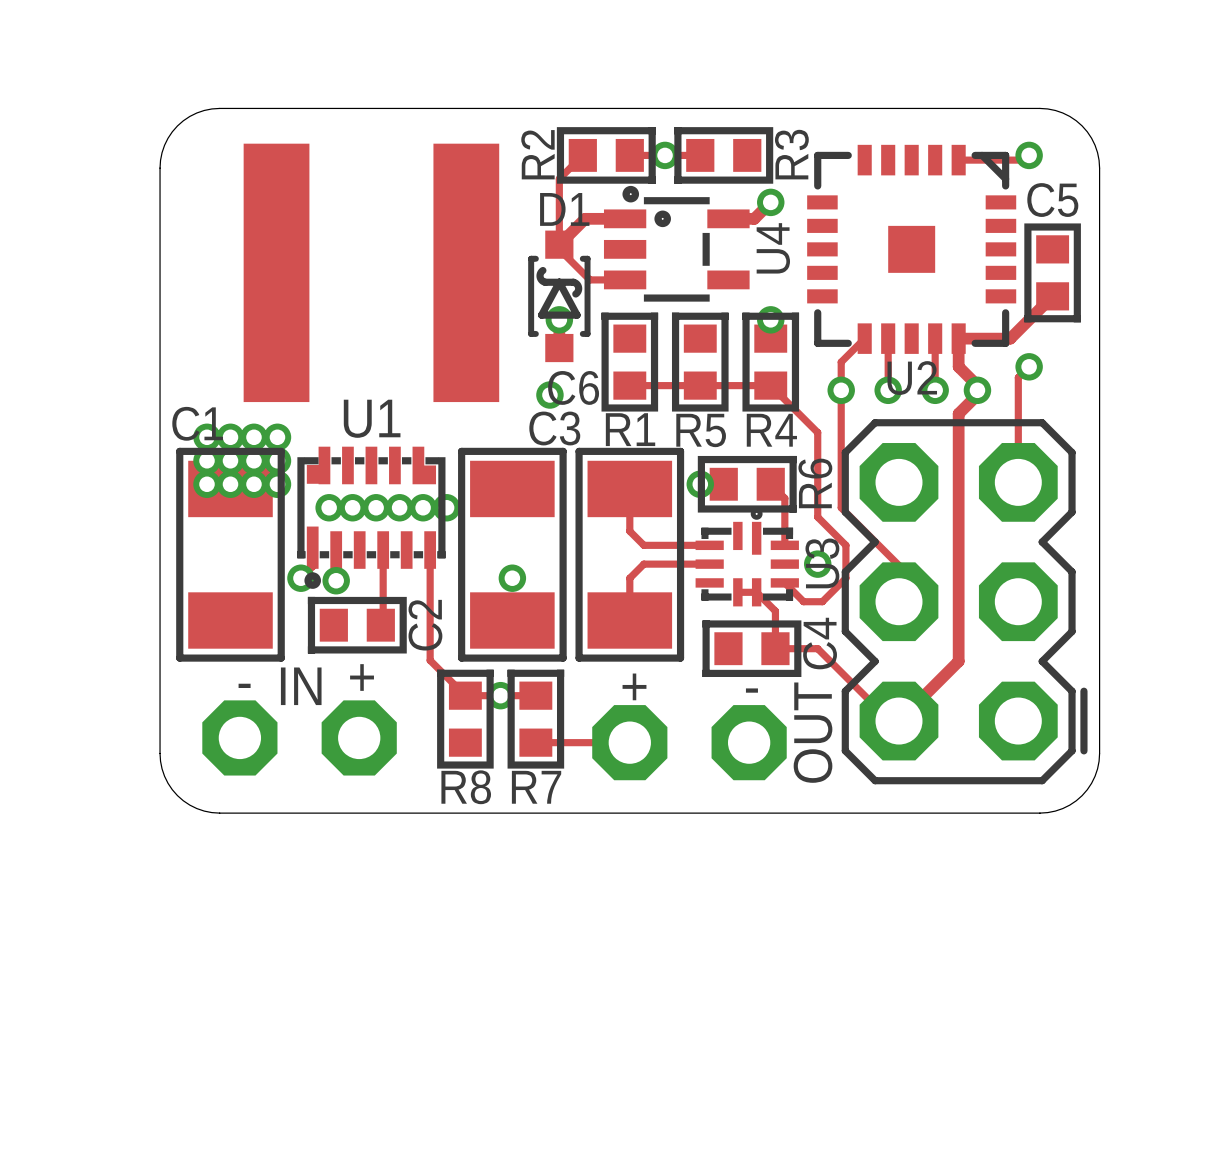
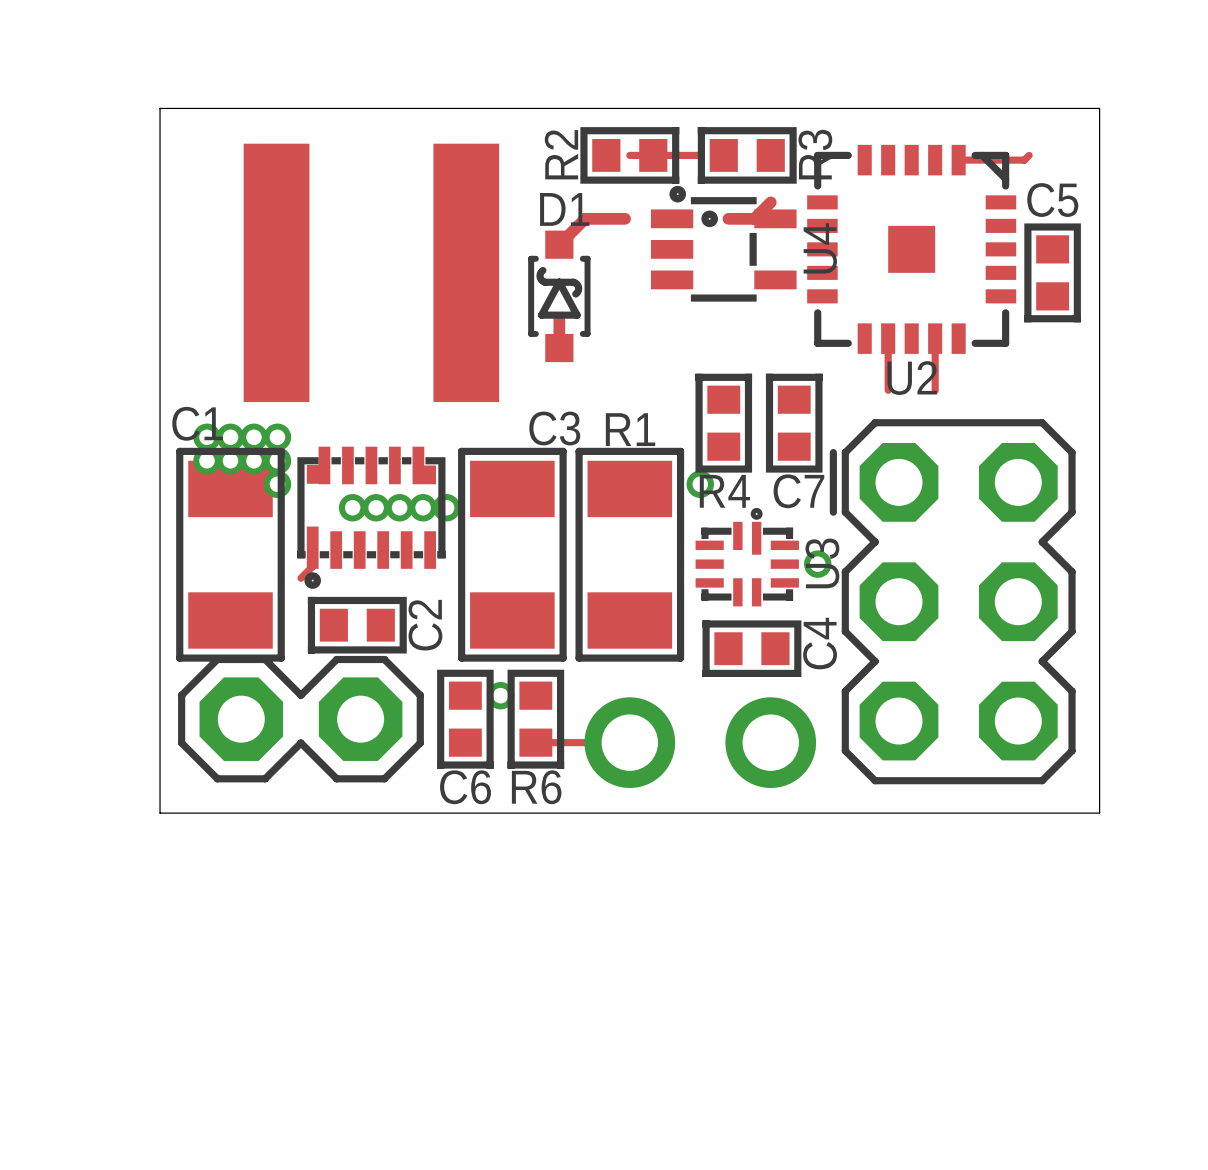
board edge: (219, 108) (196, 112) (177, 125) (164, 145) (160, 168) -> (219, 108) (160, 108) (160, 168)
board edge: (1039, 108) (1062, 112) (1082, 125) (1095, 145) (1099, 168) -> (1039, 108) (1099, 108) (1099, 168)
track: (582, 155) (559, 178) (559, 249) (589, 279) (625, 279) -> none
R2 position: (606, 155) -> (629, 155)
via: (665, 155) -> none
R3 position: (723, 155) -> (747, 155)
via: (1029, 155) -> none
via: (770, 202) -> none
U4 position: (676, 243) -> (723, 243)
track: (1052, 296) (1010, 338) (958, 338) (958, 366) (977, 385) (977, 395) (958, 413) (958, 661) (899, 721) (890, 721) (817, 648) (775, 648) (775, 611) (756, 592) (737, 592) -> none
via: (559, 319) -> none
via: (770, 319) -> none
track: (864, 338) (841, 362) (841, 507) (899, 565) (899, 601) -> none
C6 rotation: 0° (629, 362) -> 180° (465, 719)
C6 position: (629, 362) -> (465, 719)
R5: (700, 362) -> none
R4 position: (770, 362) -> (723, 423)
track: (1029, 366) (1018, 377) (1018, 482) -> none
via: (1029, 366) -> none
track: (629, 385) (770, 385) (817, 432) (817, 517) (845, 545) (845, 578) (822, 601) (803, 601) (784, 582) -> none
via: (841, 390) -> none
via: (888, 390) -> none
via: (935, 390) -> none
via: (977, 390) -> none
via: (549, 395) -> none
U1 name: U1 (372, 418) -> none
C7: none -> (794, 423)
via: (207, 484) -> none
via: (230, 484) -> none
via: (253, 484) -> none
R6 rotation: 0° (747, 484) -> 90° clockwise (535, 719)
R6 position: (747, 484) -> (535, 719)
track: (770, 484) (784, 498) (784, 545) -> none
track: (629, 488) (629, 531) (643, 545) (709, 545) -> none
via: (329, 507) -> none
track: (383, 550) (383, 622) (380, 625) -> none
track: (430, 550) (430, 660) (465, 695) (535, 695) -> none
track: (709, 564) (643, 564) (629, 578) (629, 620) -> none
via: (300, 578) -> none
via: (512, 578) -> none
via: (336, 580) -> none
part rotation: 0° (964, 601) -> 180° (952, 601)
text: + (362, 677) -> none
text: - (244, 685) -> none
text: IN (301, 686) -> none
text: + (634, 686) -> none
text: - (751, 690) -> none
part footprint: [202, 700, 397, 776] -> [178, 655, 424, 783]
R8: (465, 719) -> none
R7: (535, 719) -> none
text: OUT (813, 732) -> none
part: none -> (629, 742)
part: (689, 742) -> none
part: none -> (770, 742)
board edge: (160, 753) (164, 776) (177, 795) (196, 808) (219, 813) -> (160, 753) (160, 813) (219, 813)
board edge: (1099, 753) (1095, 776) (1082, 795) (1062, 808) (1039, 813) -> (1099, 753) (1099, 813) (1039, 813)

